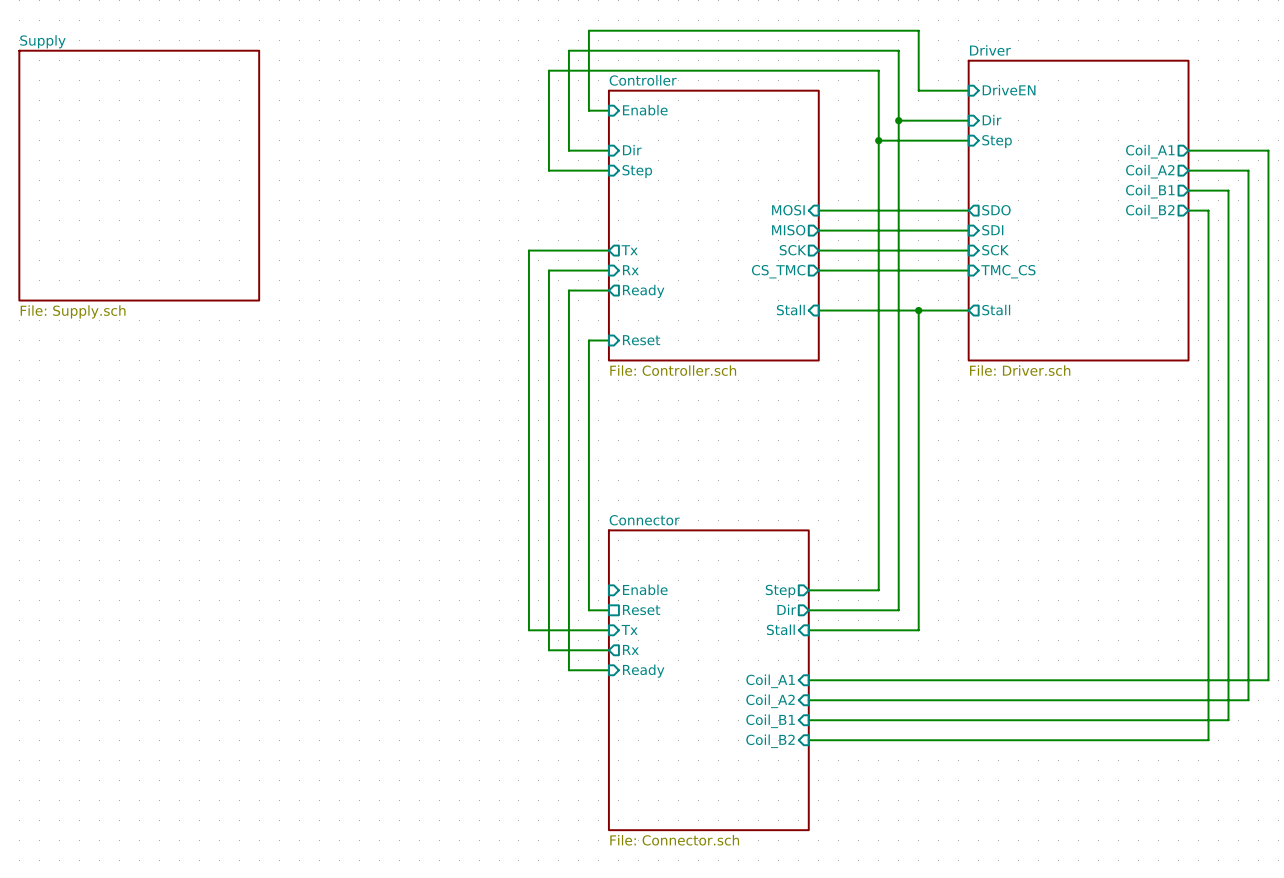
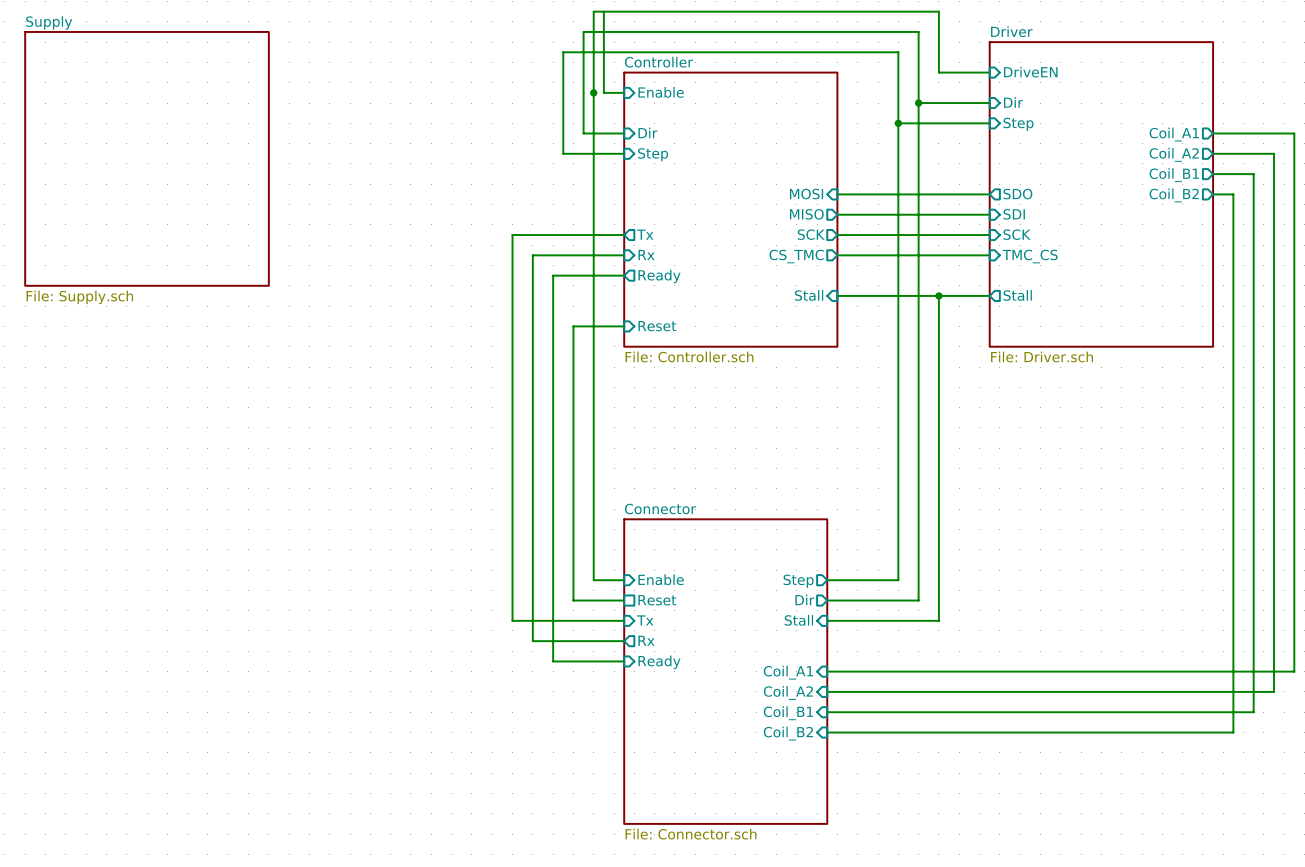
wire: none -> (603, 11) (593, 11) (593, 580) (624, 580)
junction: none -> (593, 92)
wire: (528, 250) (528, 630) -> (542, 235) (512, 235) (512, 620) (542, 620)
wire: (548, 270) (548, 650) -> (563, 255) (532, 255) (532, 641) (563, 641)
wire: (568, 290) (568, 670) -> (583, 275) (553, 275) (553, 661) (583, 661)
wire: (588, 340) (588, 610) -> (603, 326) (573, 326) (573, 600) (603, 600)

